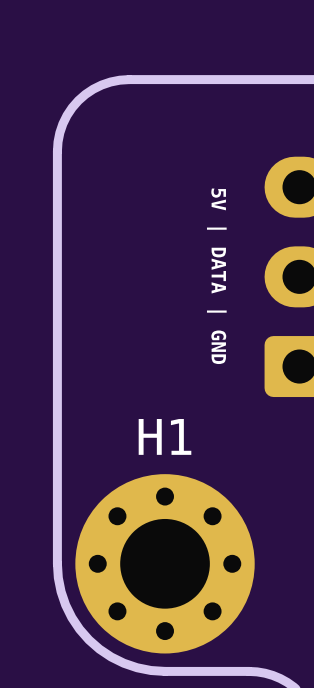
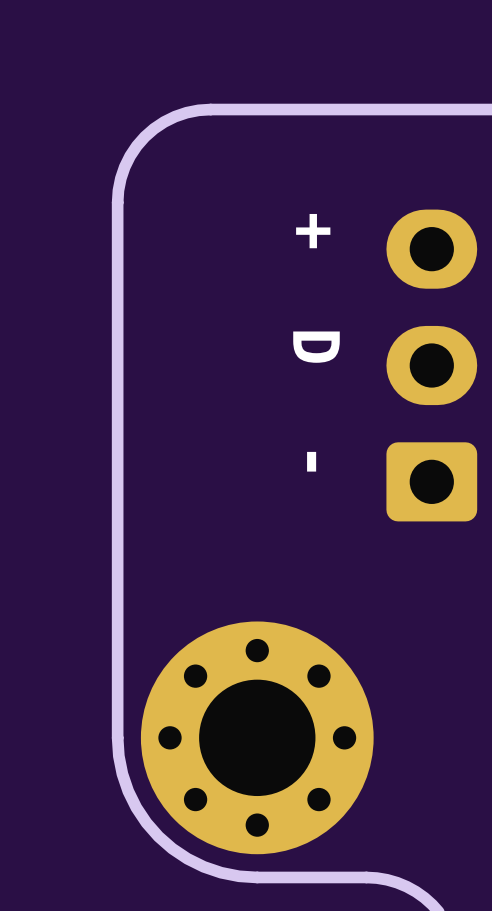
text: 5V | DATA | GND (216, 276) -> + D - (316, 342)
H1 name: H1 (165, 436) -> none

